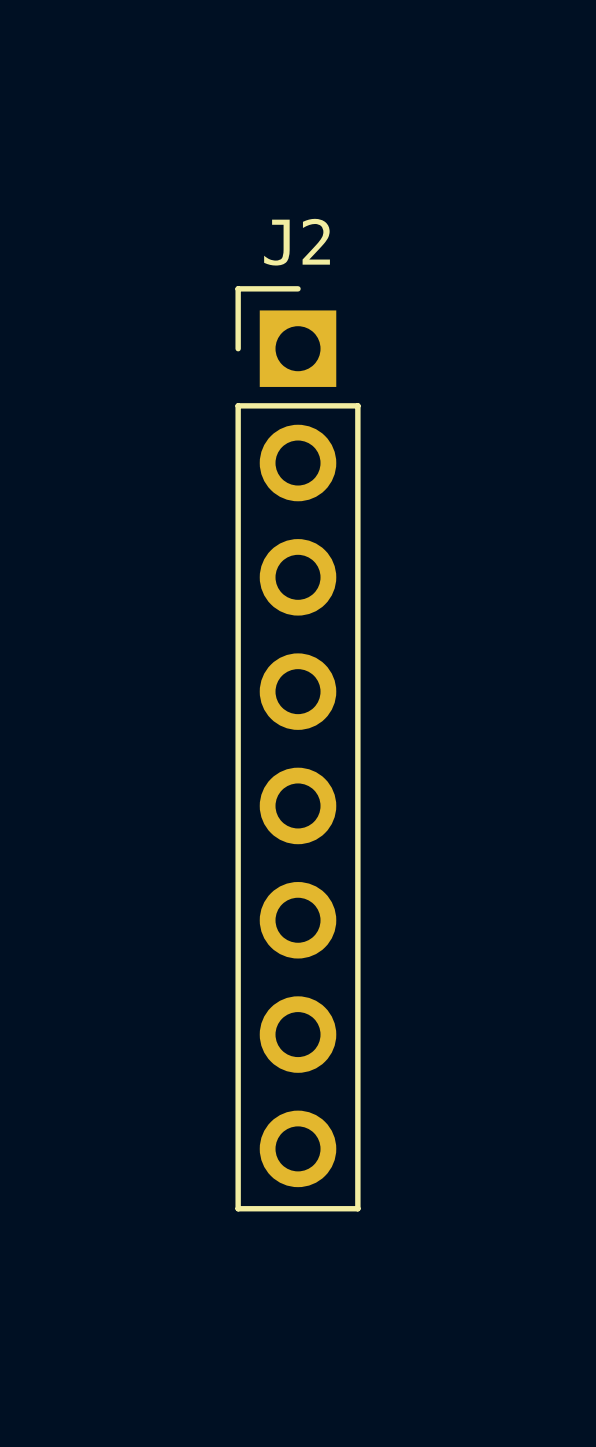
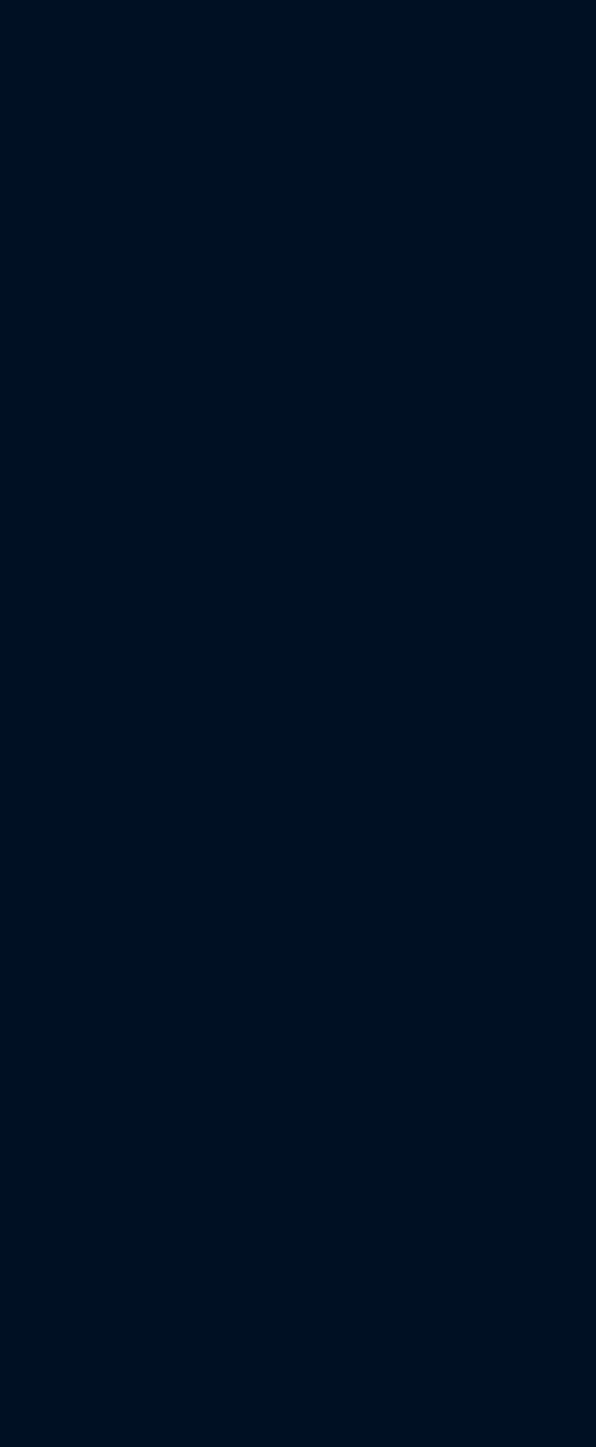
J2: (298, 748) -> none

